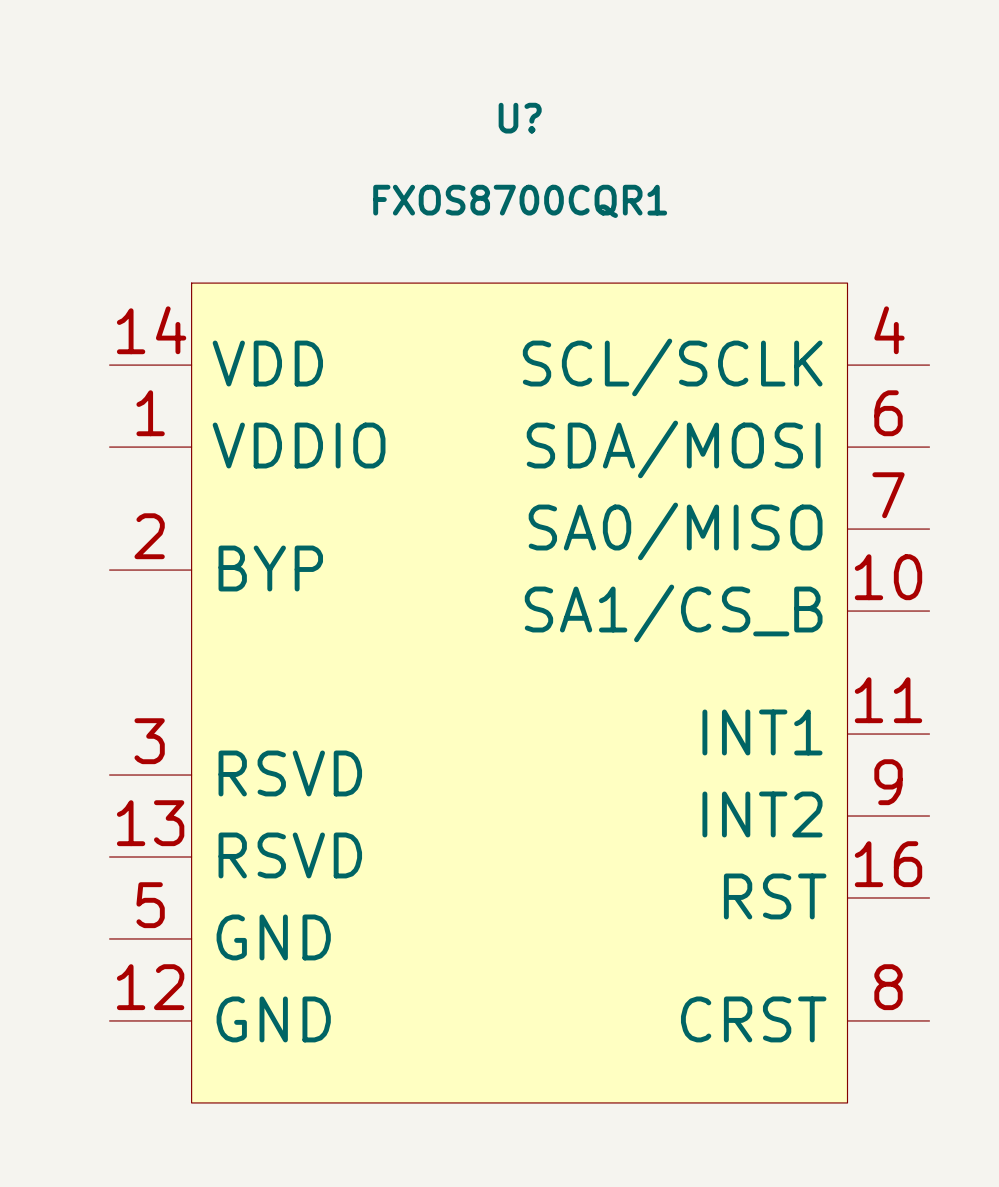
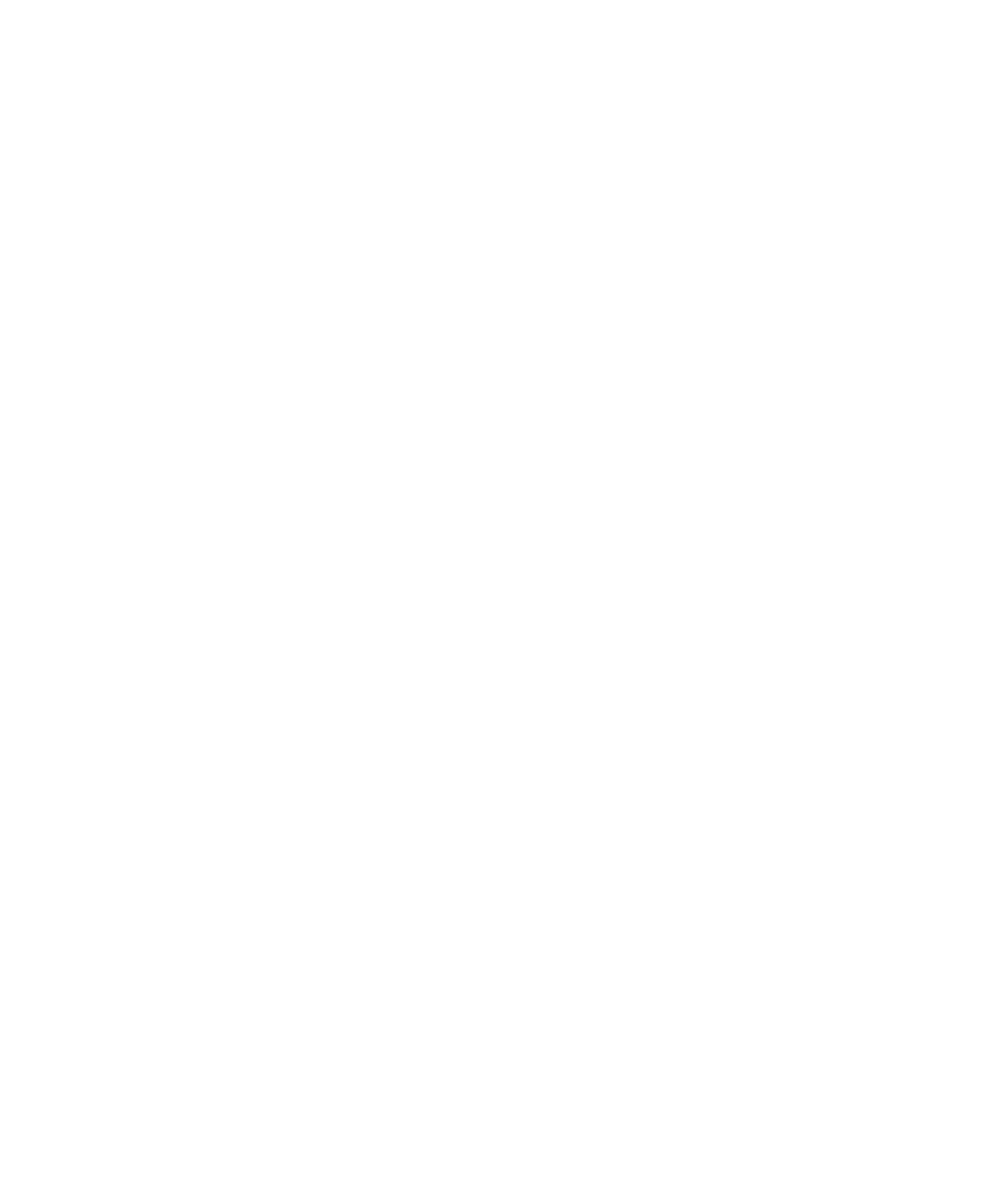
U?: FXOS8700CQR1 (519, 693) -> none

